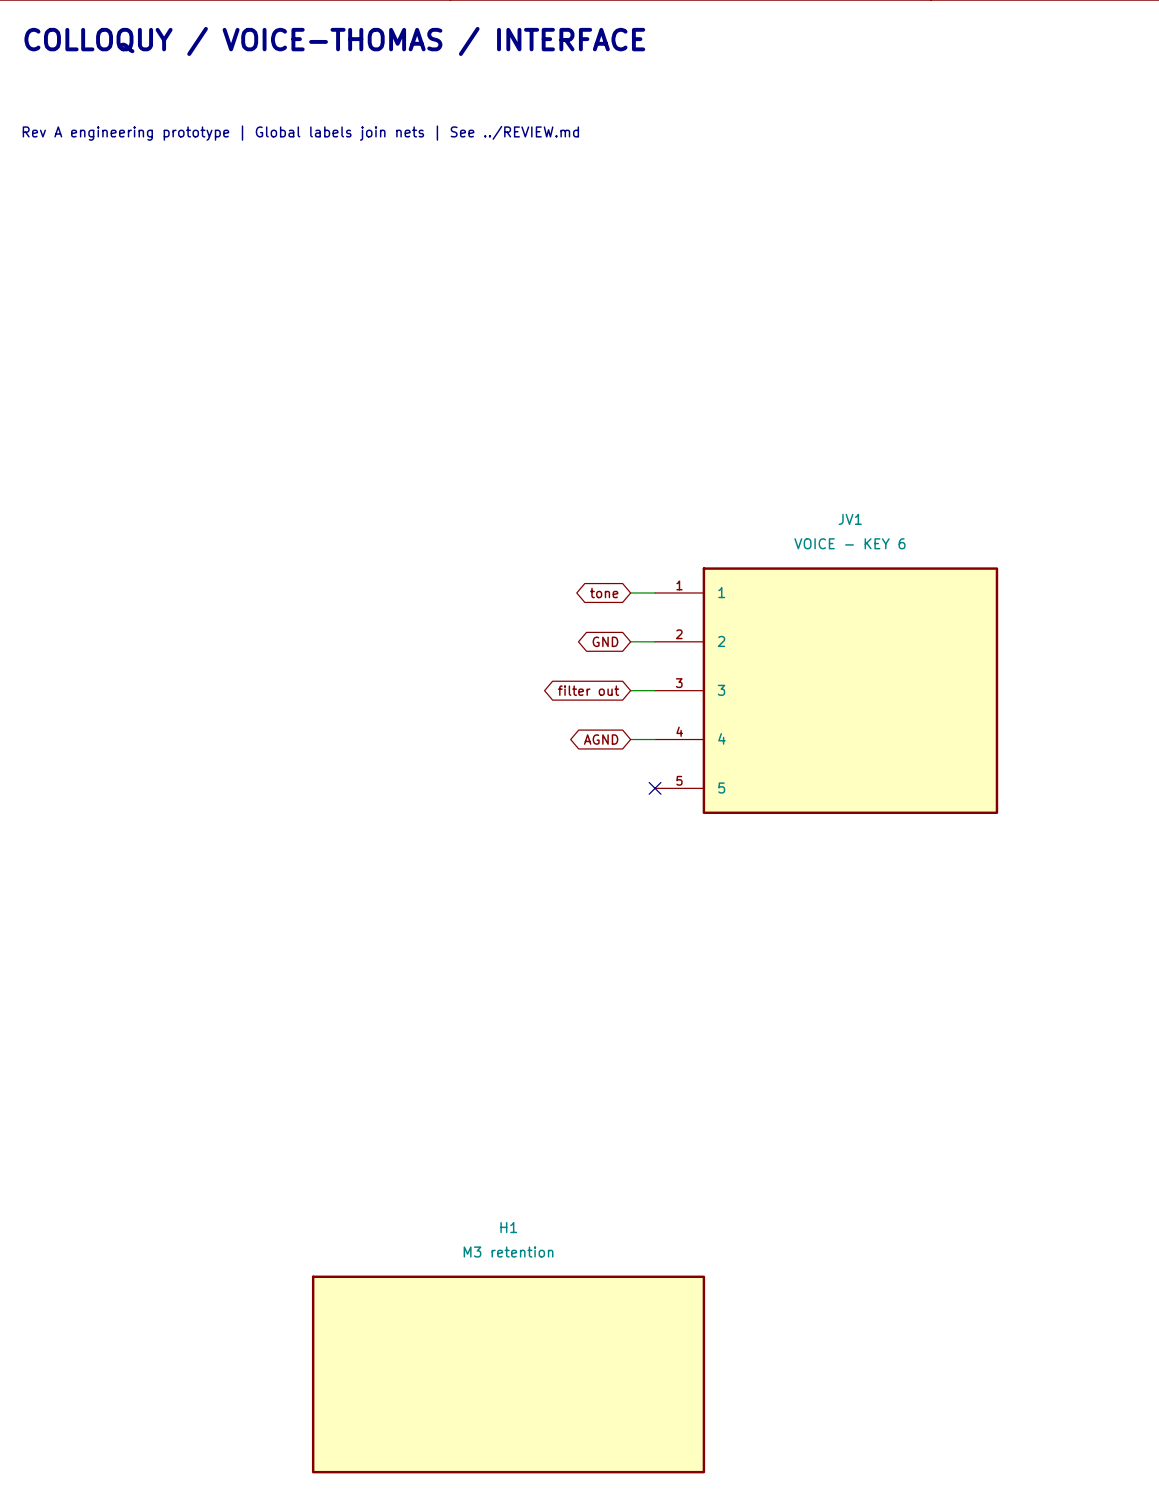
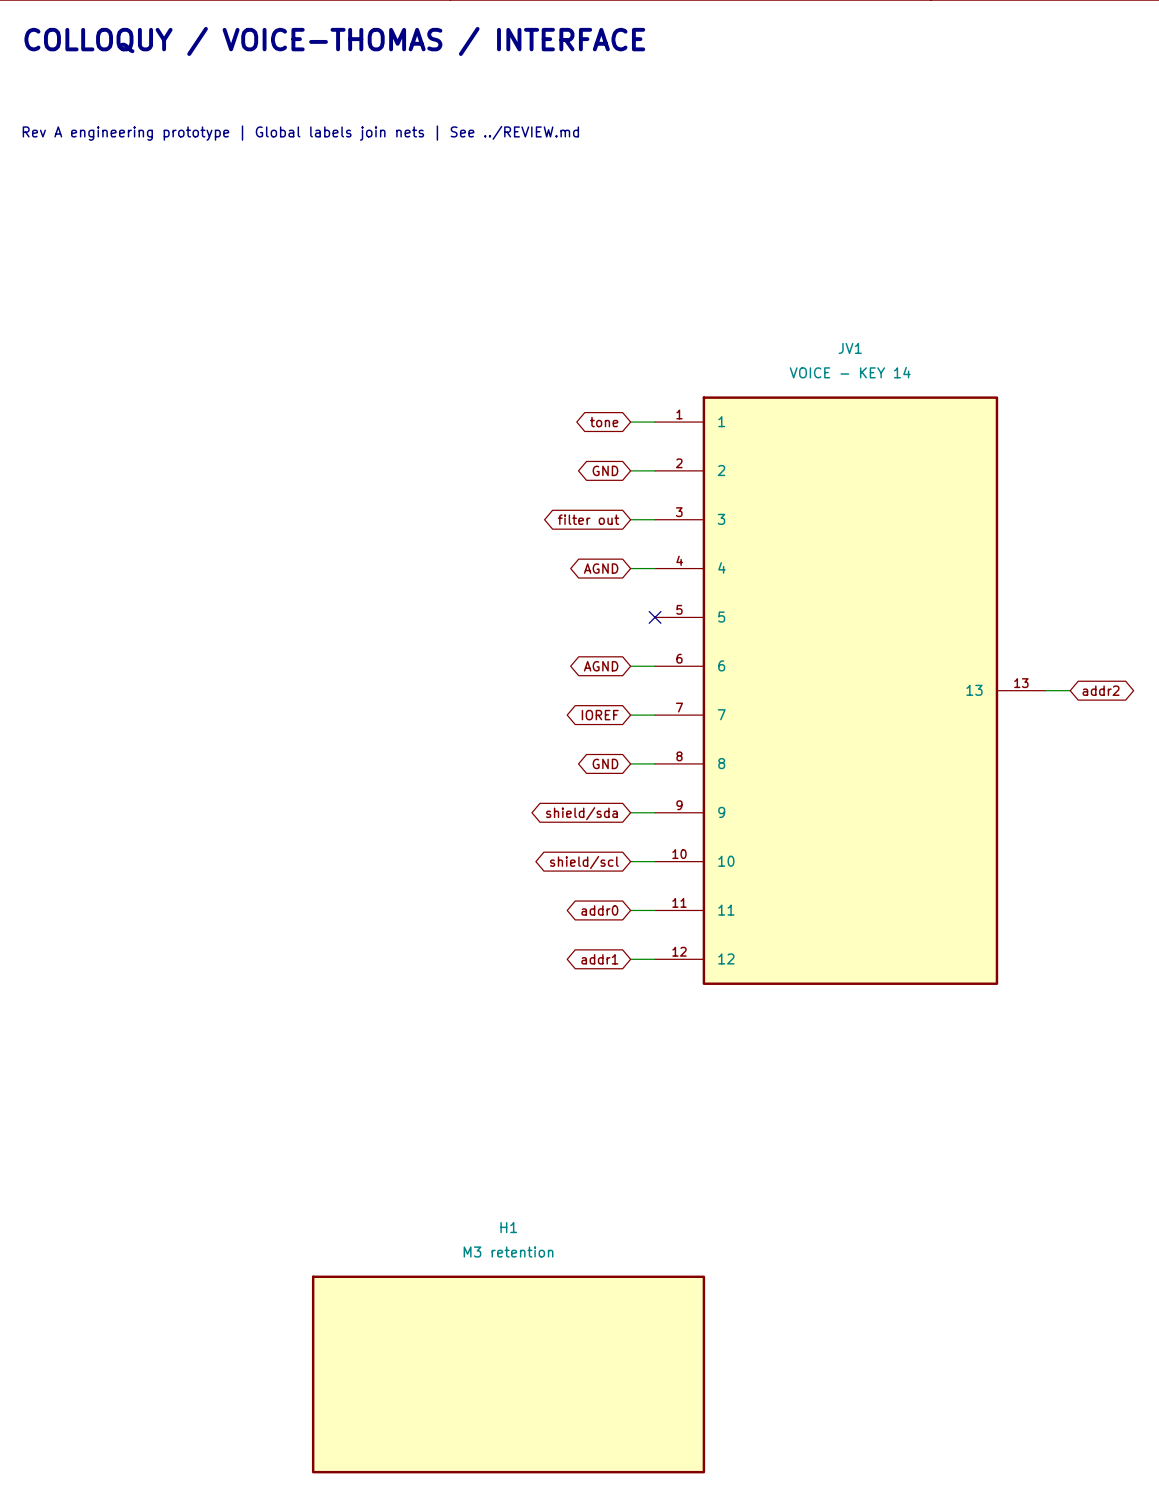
wire: none -> (630, 422) (655, 422)
global label: none -> GND (605, 470)
wire: none -> (630, 470) (655, 470)
wire: none -> (630, 519) (655, 519)
JV1 name position: JV1 (850, 519) -> JV1 (850, 348)
JV1 value: VOICE - KEY 6 (849, 543) -> VOICE - KEY 14 (850, 372)
JV1 symbol: [655, 567, 999, 815] -> [655, 396, 1046, 985]
global label: none -> AGND (601, 568)
wire: none -> (630, 568) (655, 568)
global label position: tone (604, 592) -> tone (604, 422)
wire: (630, 592) (655, 592) -> (630, 666) (655, 666)
no-connect mark: none -> (655, 617)
global label: GND (605, 641) -> none
wire: (630, 641) (655, 641) -> (630, 715) (655, 715)
global label position: filter out (588, 690) -> filter out (588, 519)
wire: (630, 690) (655, 690) -> (630, 763) (655, 763)
wire: none -> (1045, 690) (1070, 690)
global label: none -> addr2 (1101, 690)
global label: none -> IOREF (600, 715)
global label position: AGND (601, 739) -> AGND (601, 666)
wire: (630, 739) (655, 739) -> (630, 812) (655, 812)
global label: none -> GND (605, 763)
no-connect mark: (655, 788) -> none
global label: none -> shield/sda (581, 813)
wire: none -> (630, 861) (655, 861)
global label: none -> shield/scl (584, 862)
global label: none -> addr0 (599, 910)
wire: none -> (630, 910) (655, 910)
global label: none -> addr1 (599, 959)
wire: none -> (630, 959) (655, 959)

